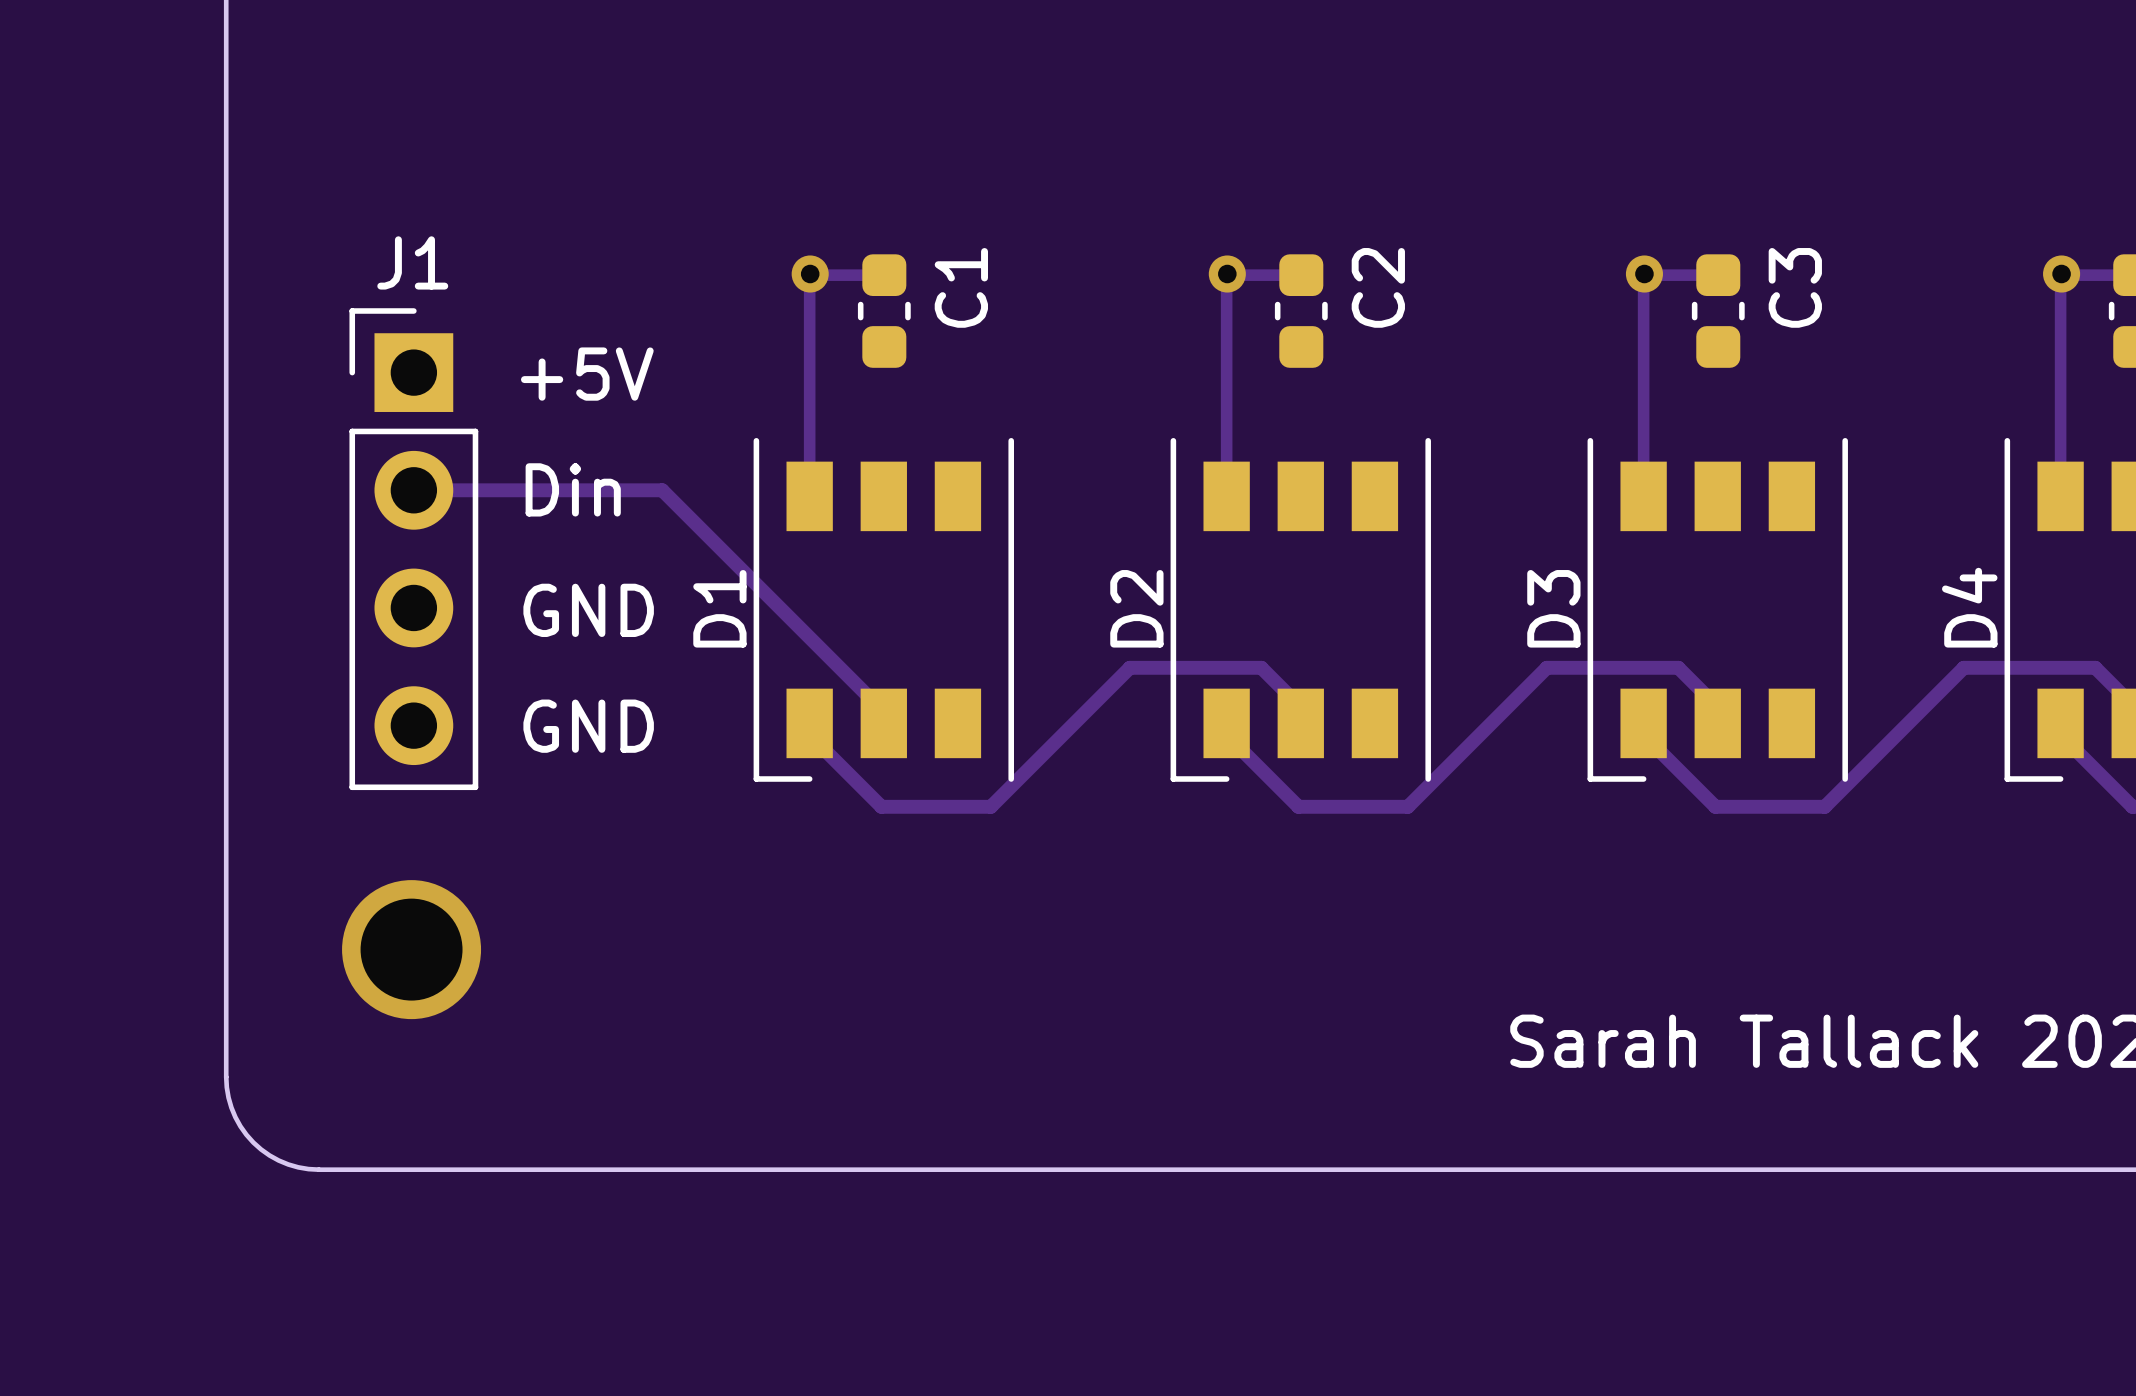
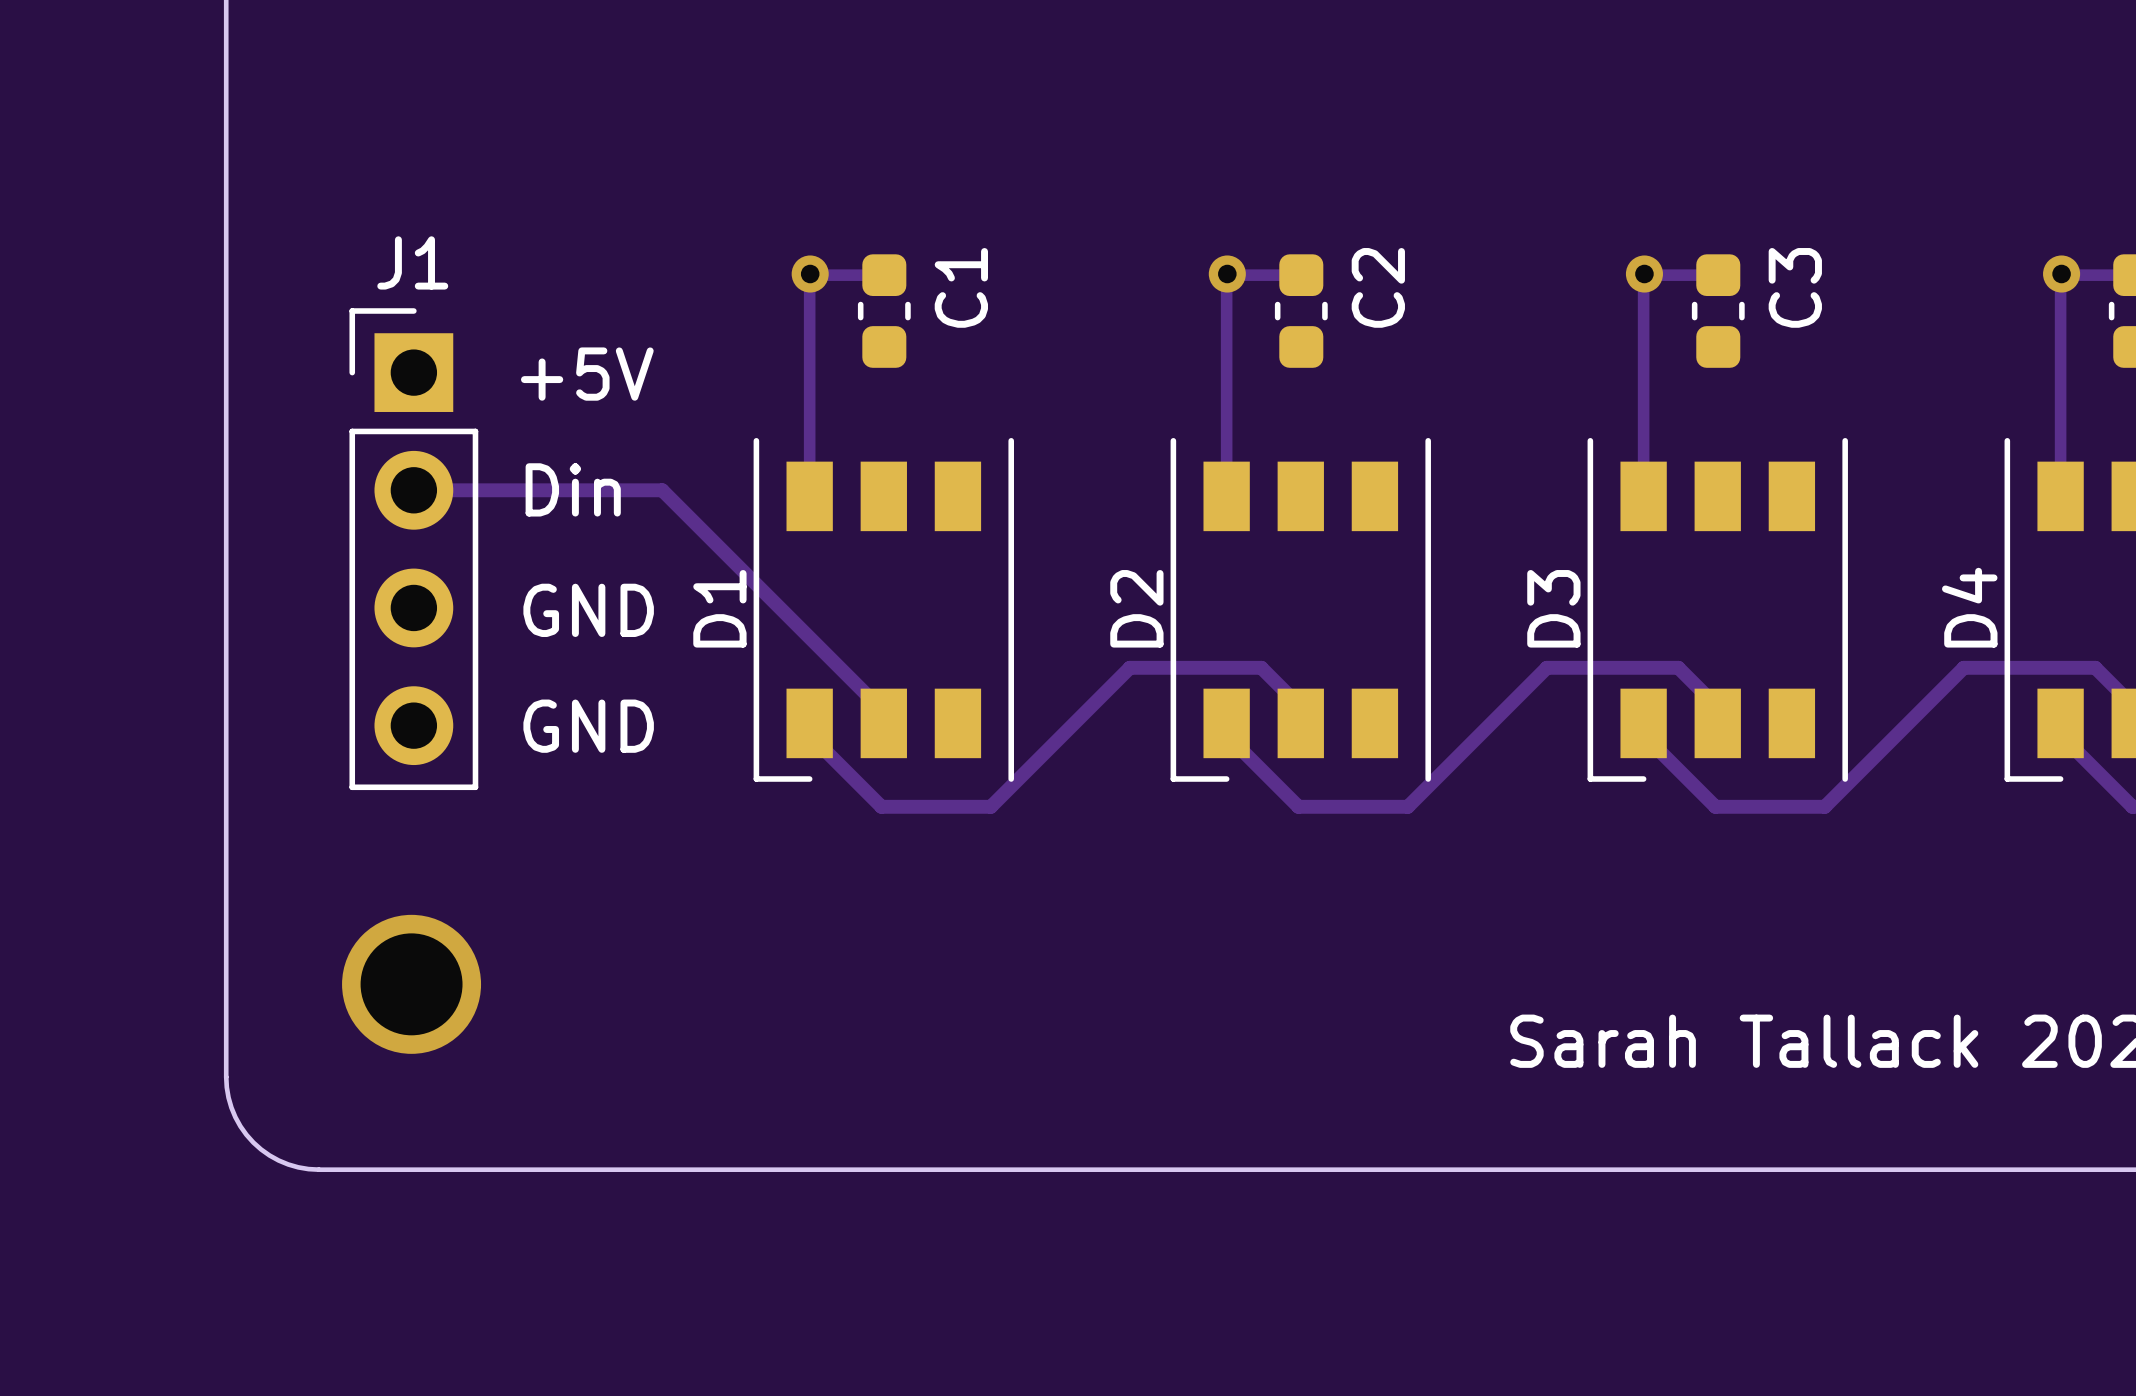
via position: (411, 949) -> (411, 984)

